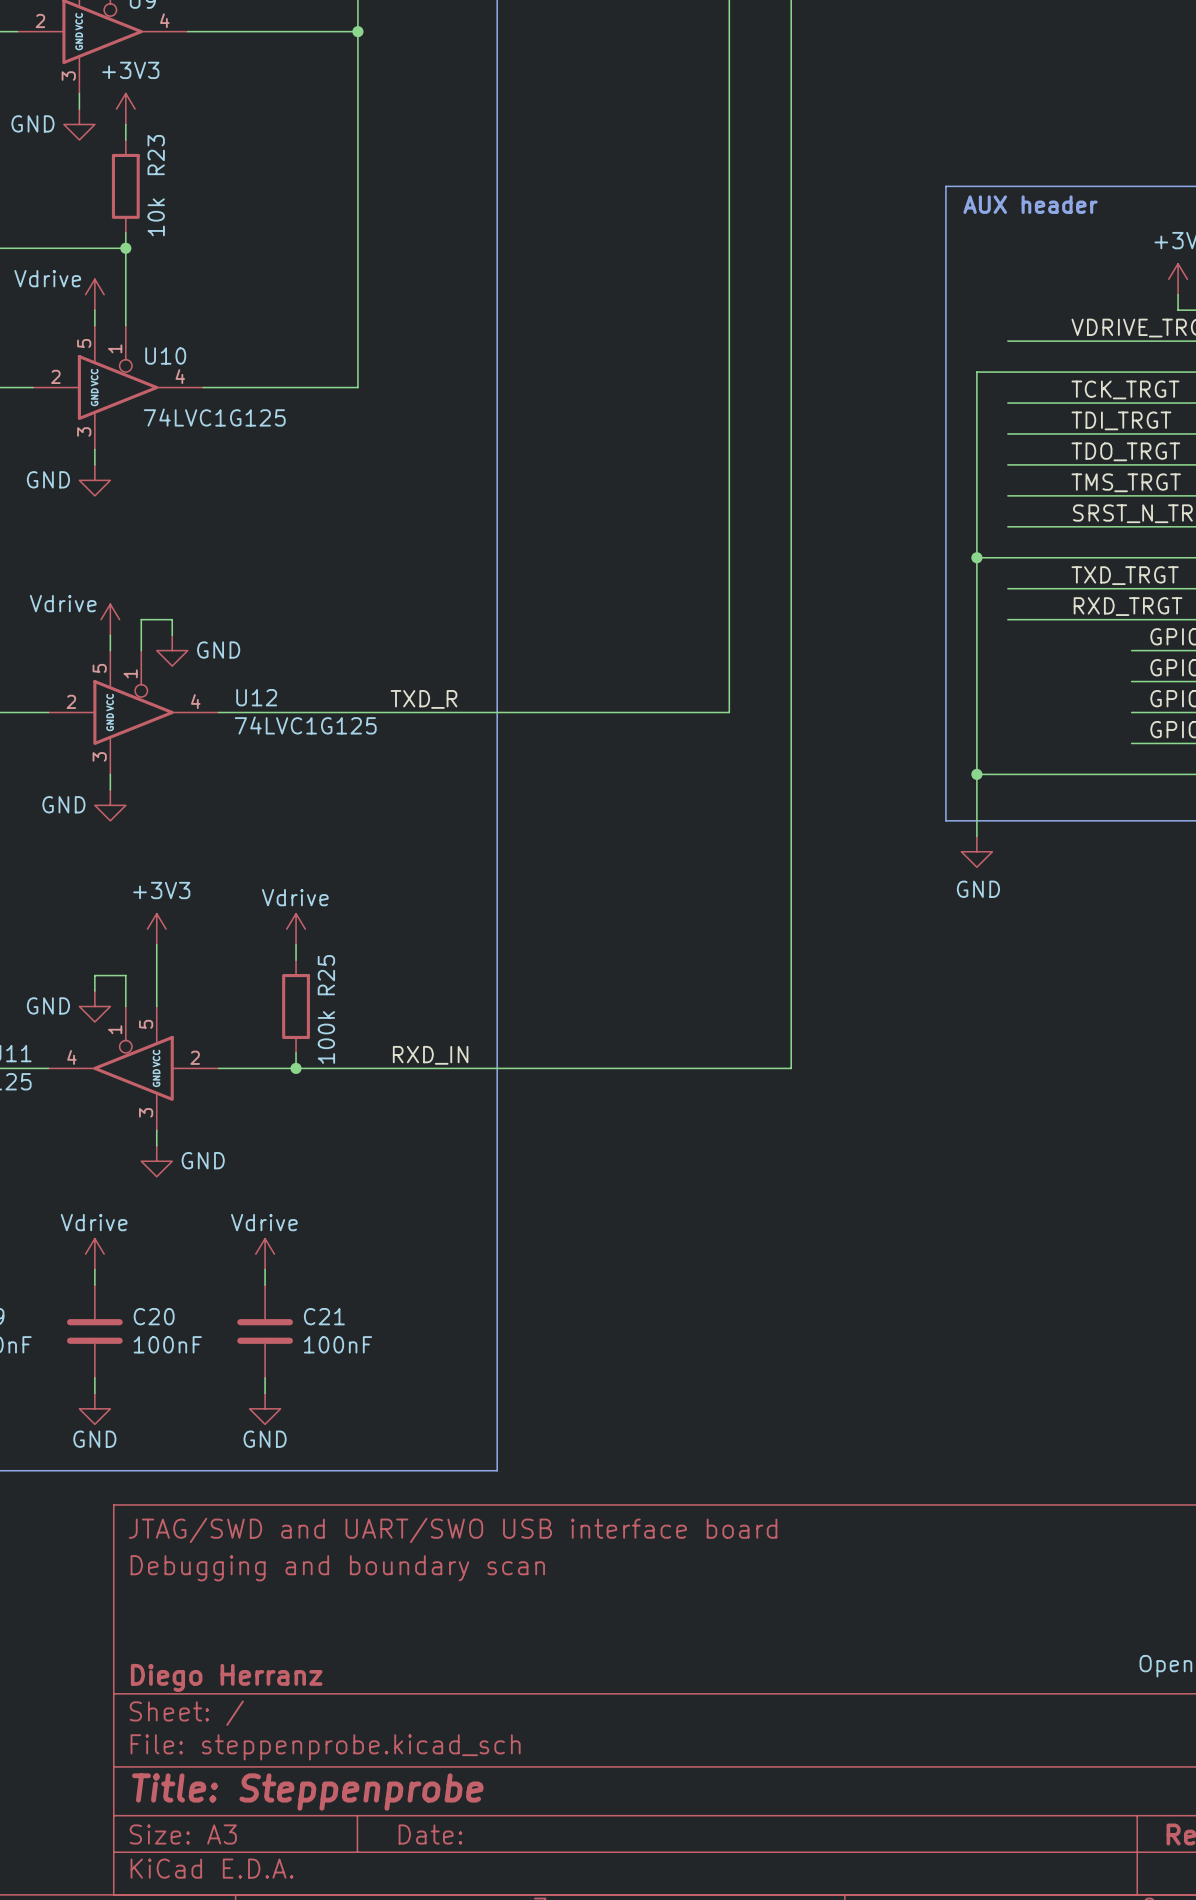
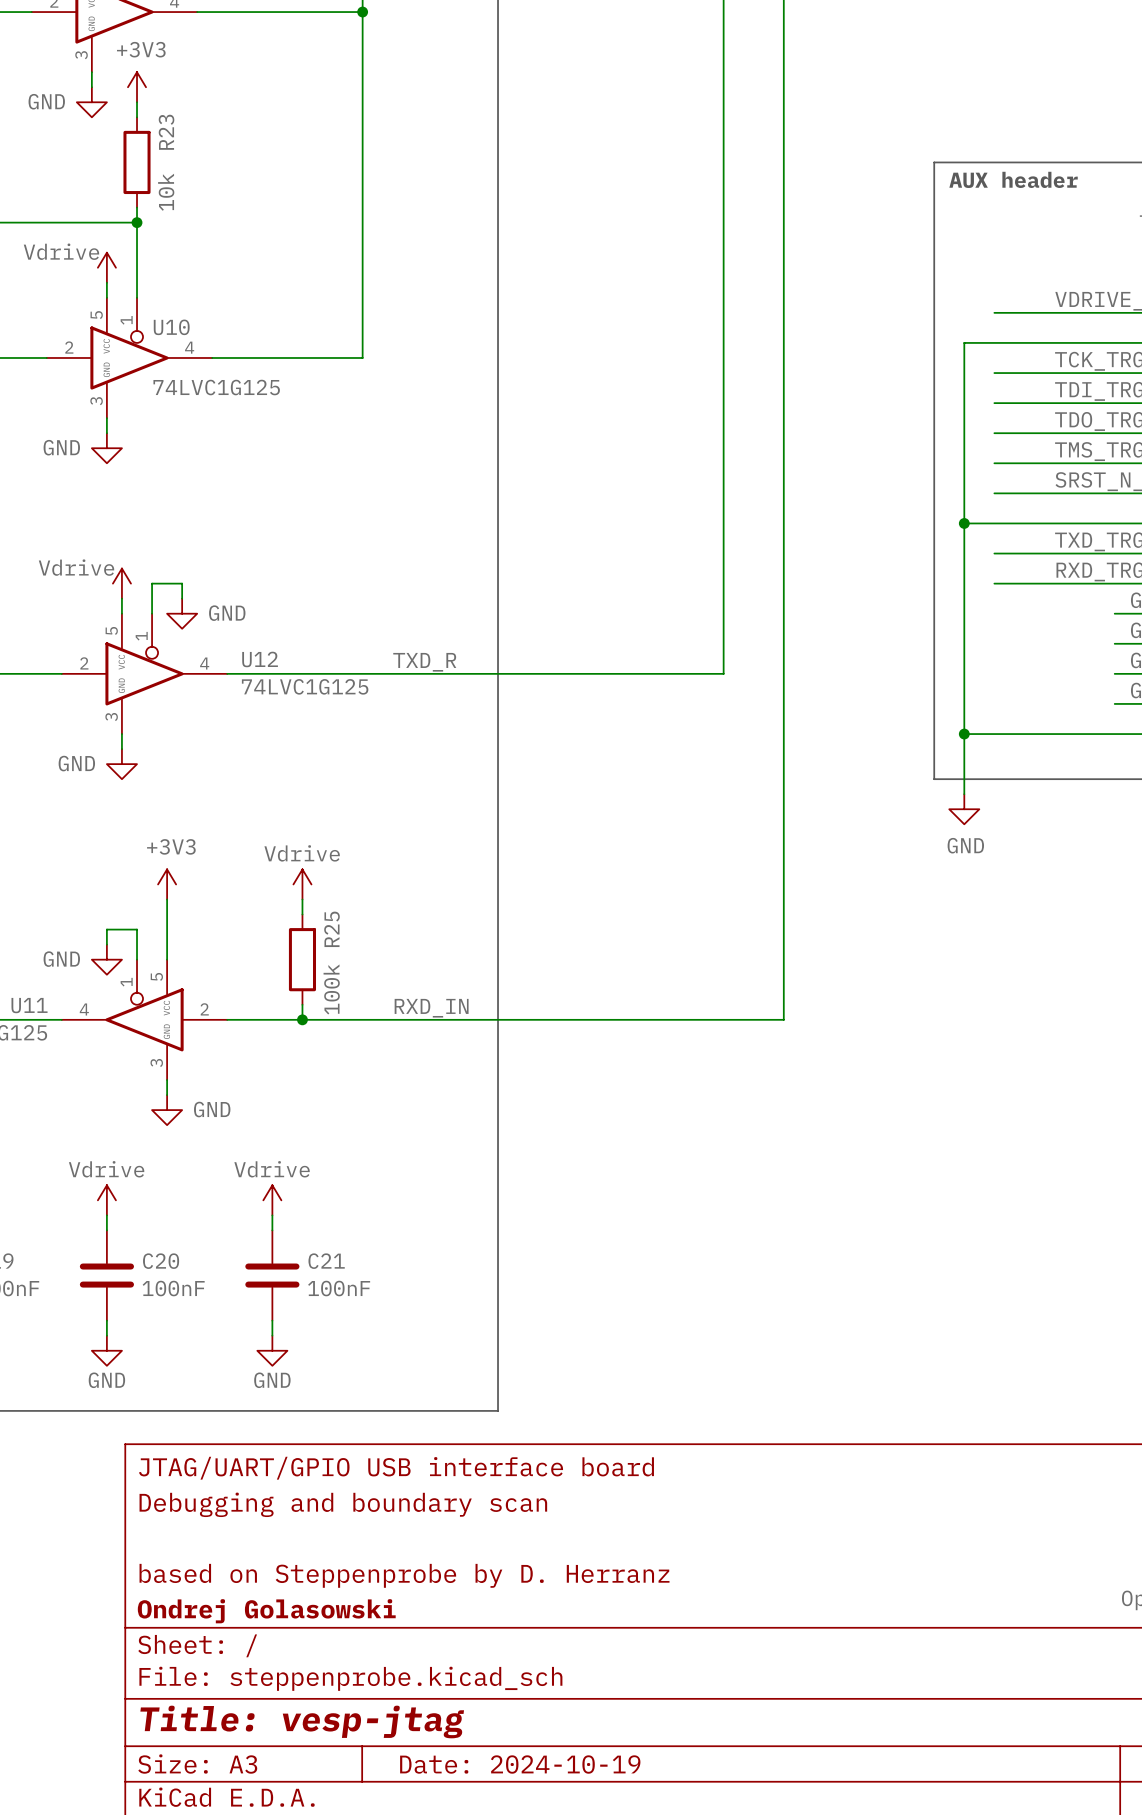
title block: JTAG/SWD and UART/SWO USB interface board (453, 1530) -> JTAG/UART/GPIO USB interface board (396, 1468)
title block: none -> based on Steppenprobe by D. Herranz (404, 1575)
title block: Diego Herranz (226, 1677) -> Ondrej Golasowski (266, 1611)
title block: Title: Steppenprobe (307, 1792) -> Title: vesp-jtag (302, 1721)
title block: Date: (430, 1834) -> Date: 2024-10-19 (520, 1764)

